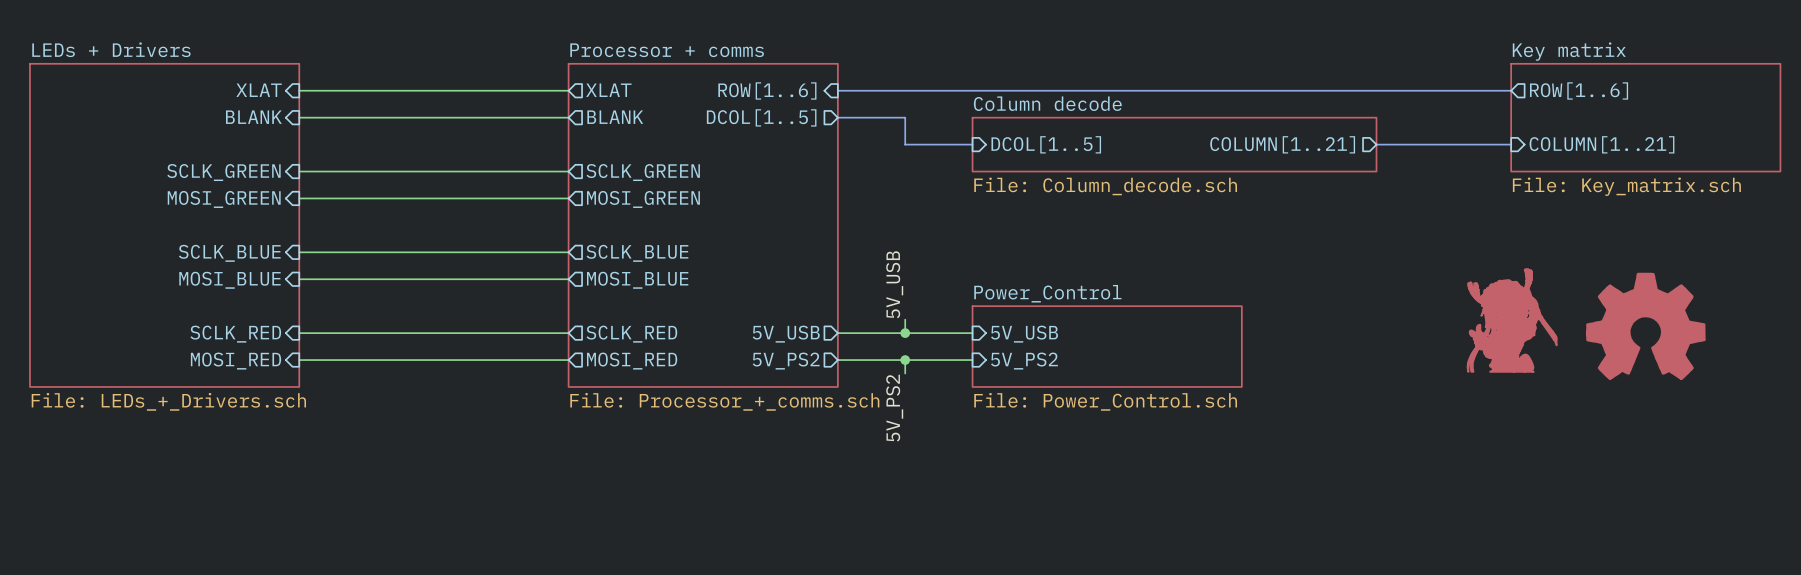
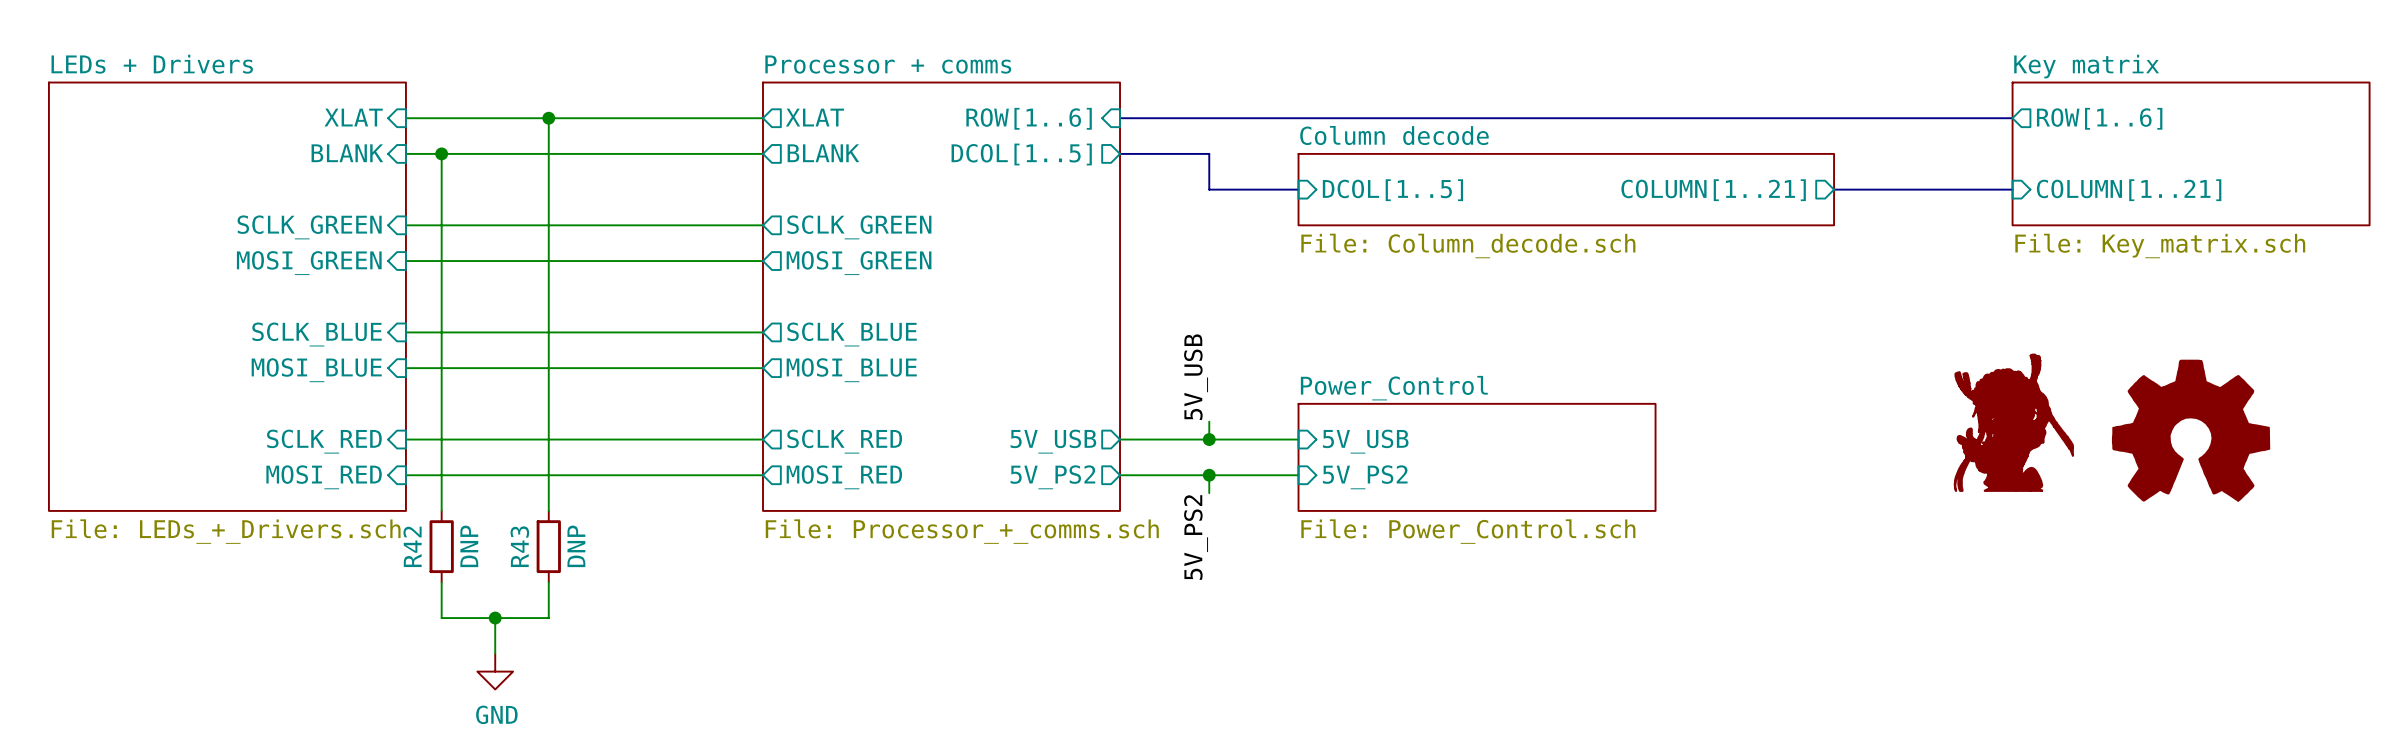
wire: none -> (548, 118) (548, 510)
junction: none -> (548, 118)
wire: none -> (441, 153) (441, 510)
junction: none -> (441, 153)
R42: none -> DNP (441, 546)
R43: none -> DNP (548, 546)
wire: none -> (441, 582) (441, 618) (548, 618) (548, 582)
wire: none -> (495, 618) (495, 653)
junction: none -> (495, 618)
power symbol: none -> GND (495, 671)

